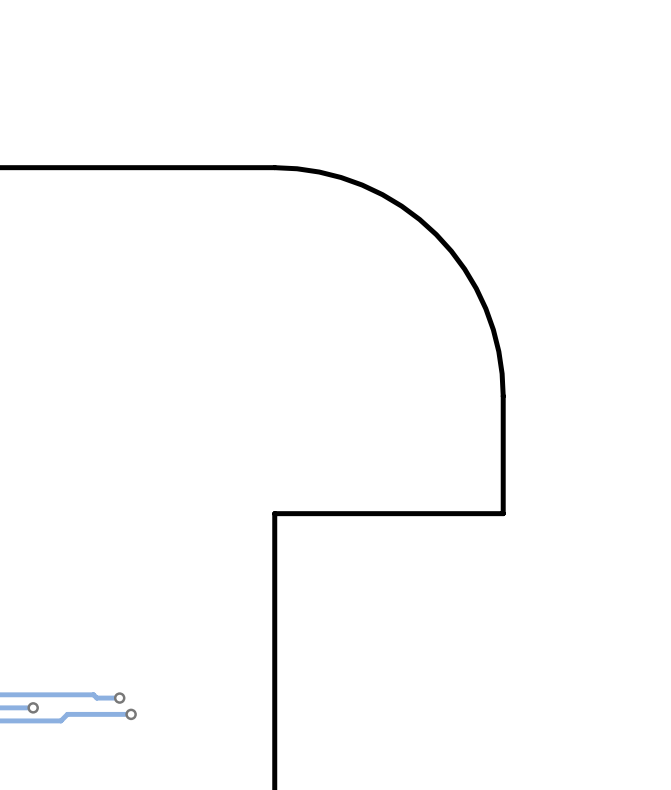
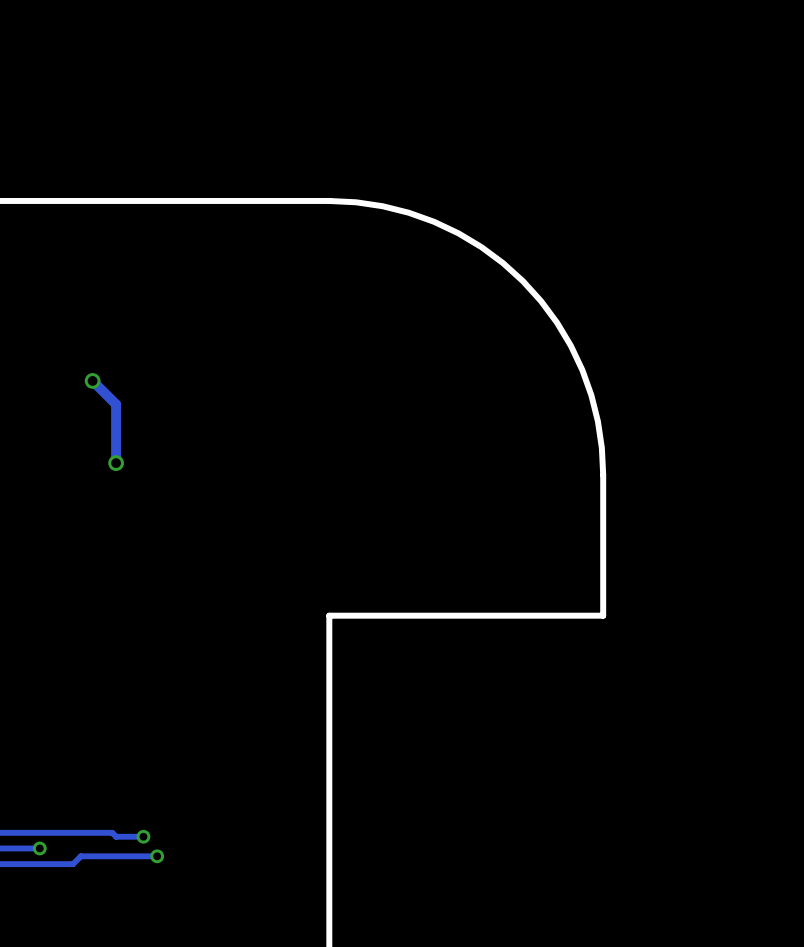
track: none -> (92, 380) (116, 404) (116, 463)
via: none -> (92, 380)
via: none -> (116, 463)

